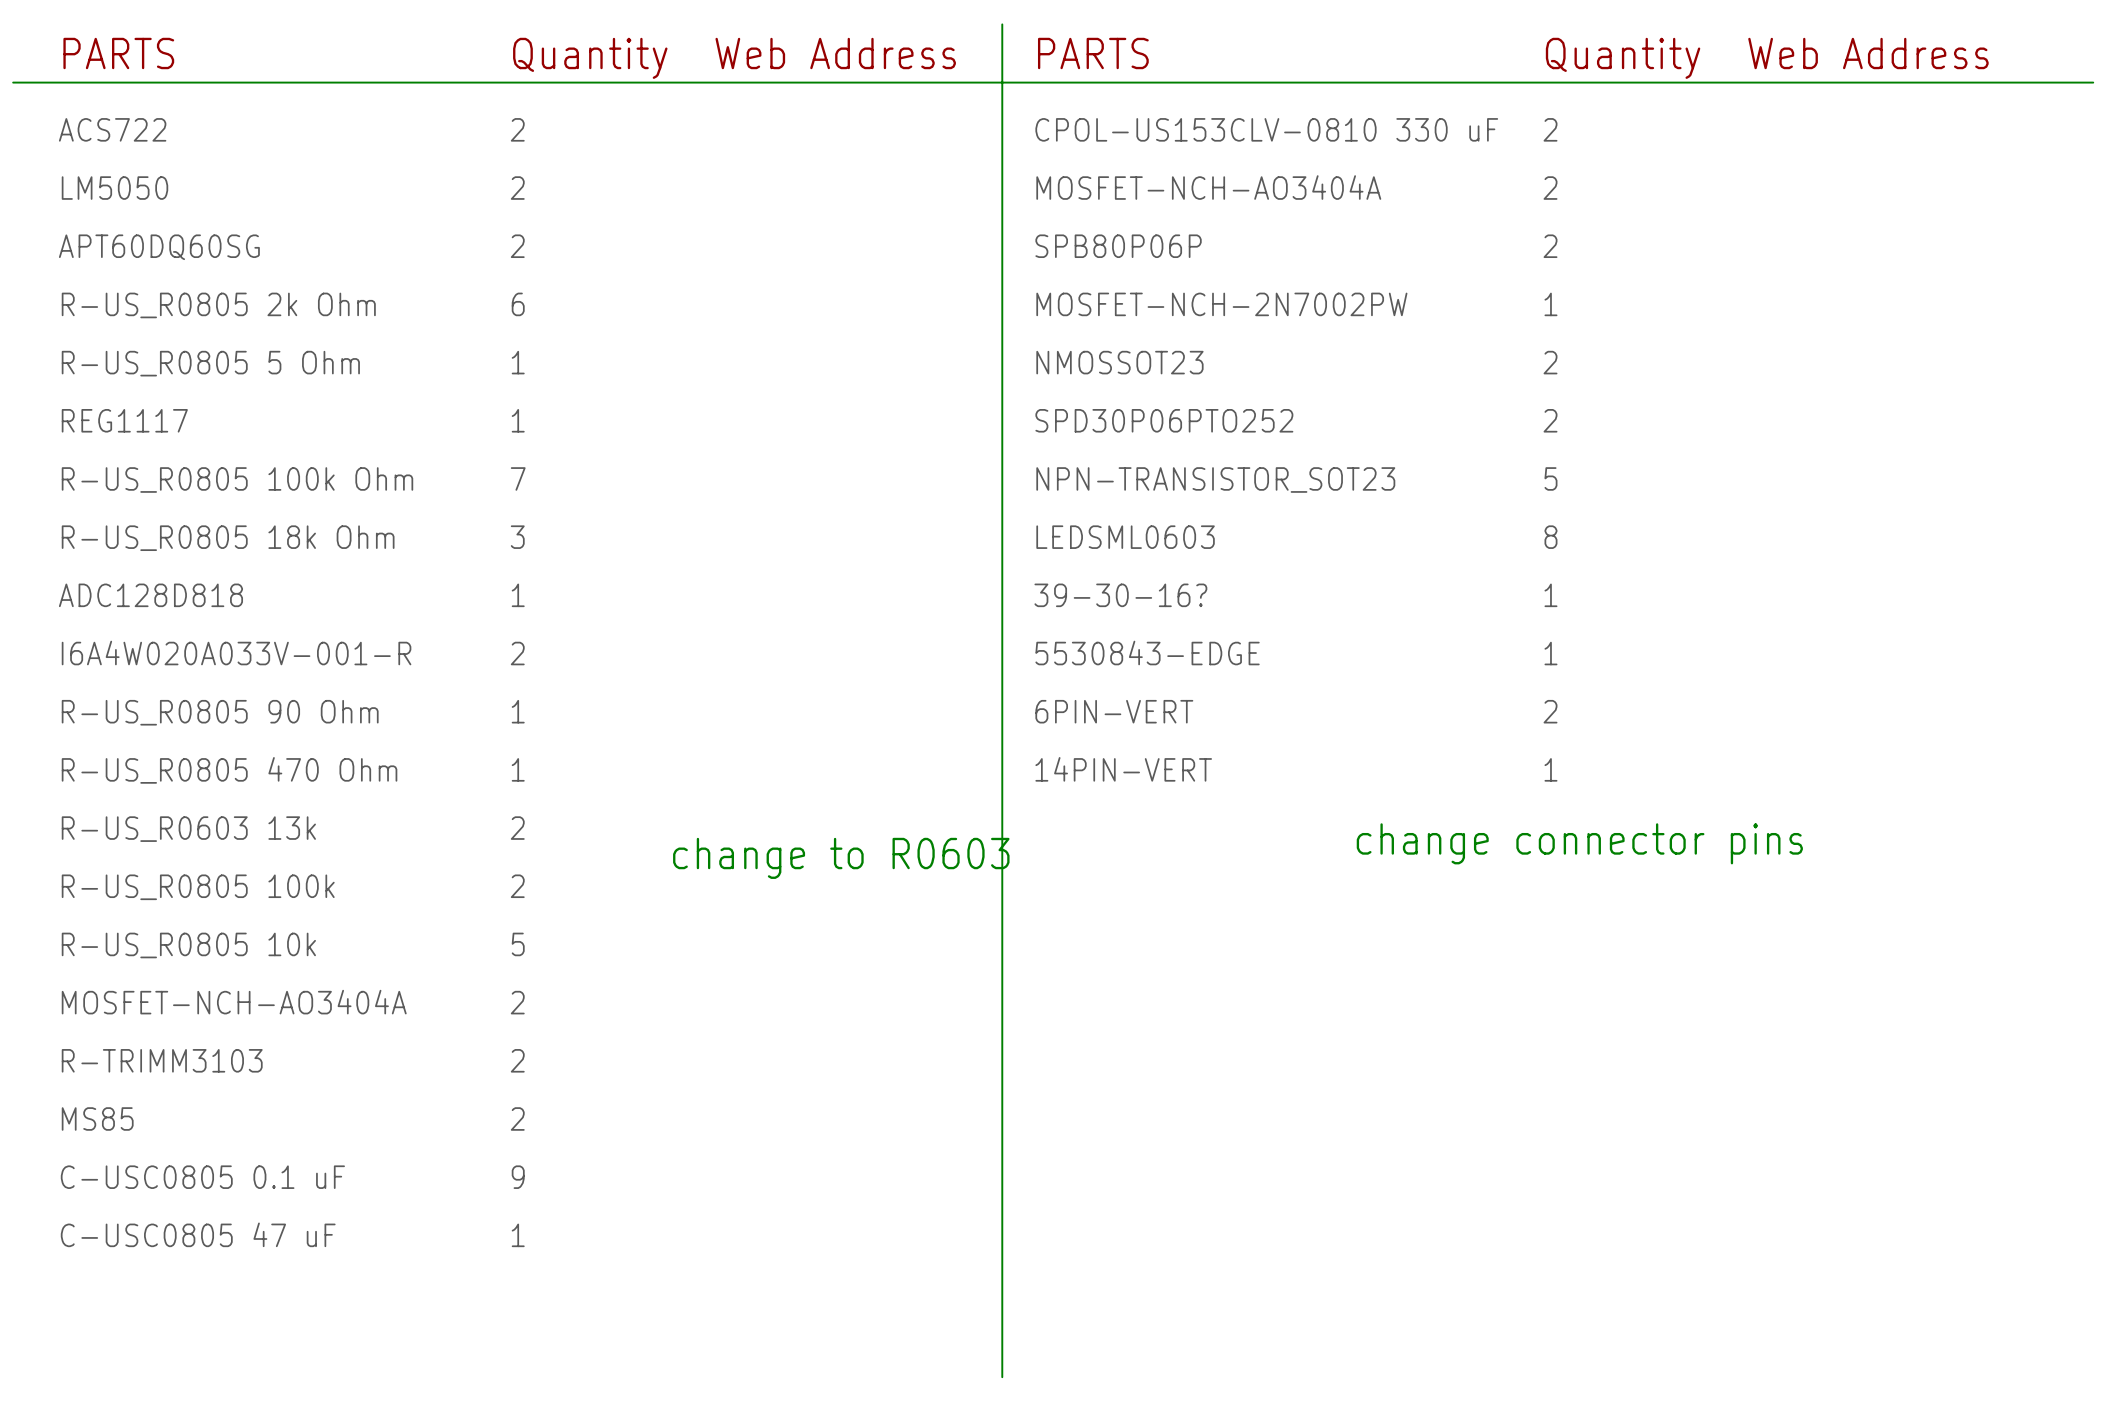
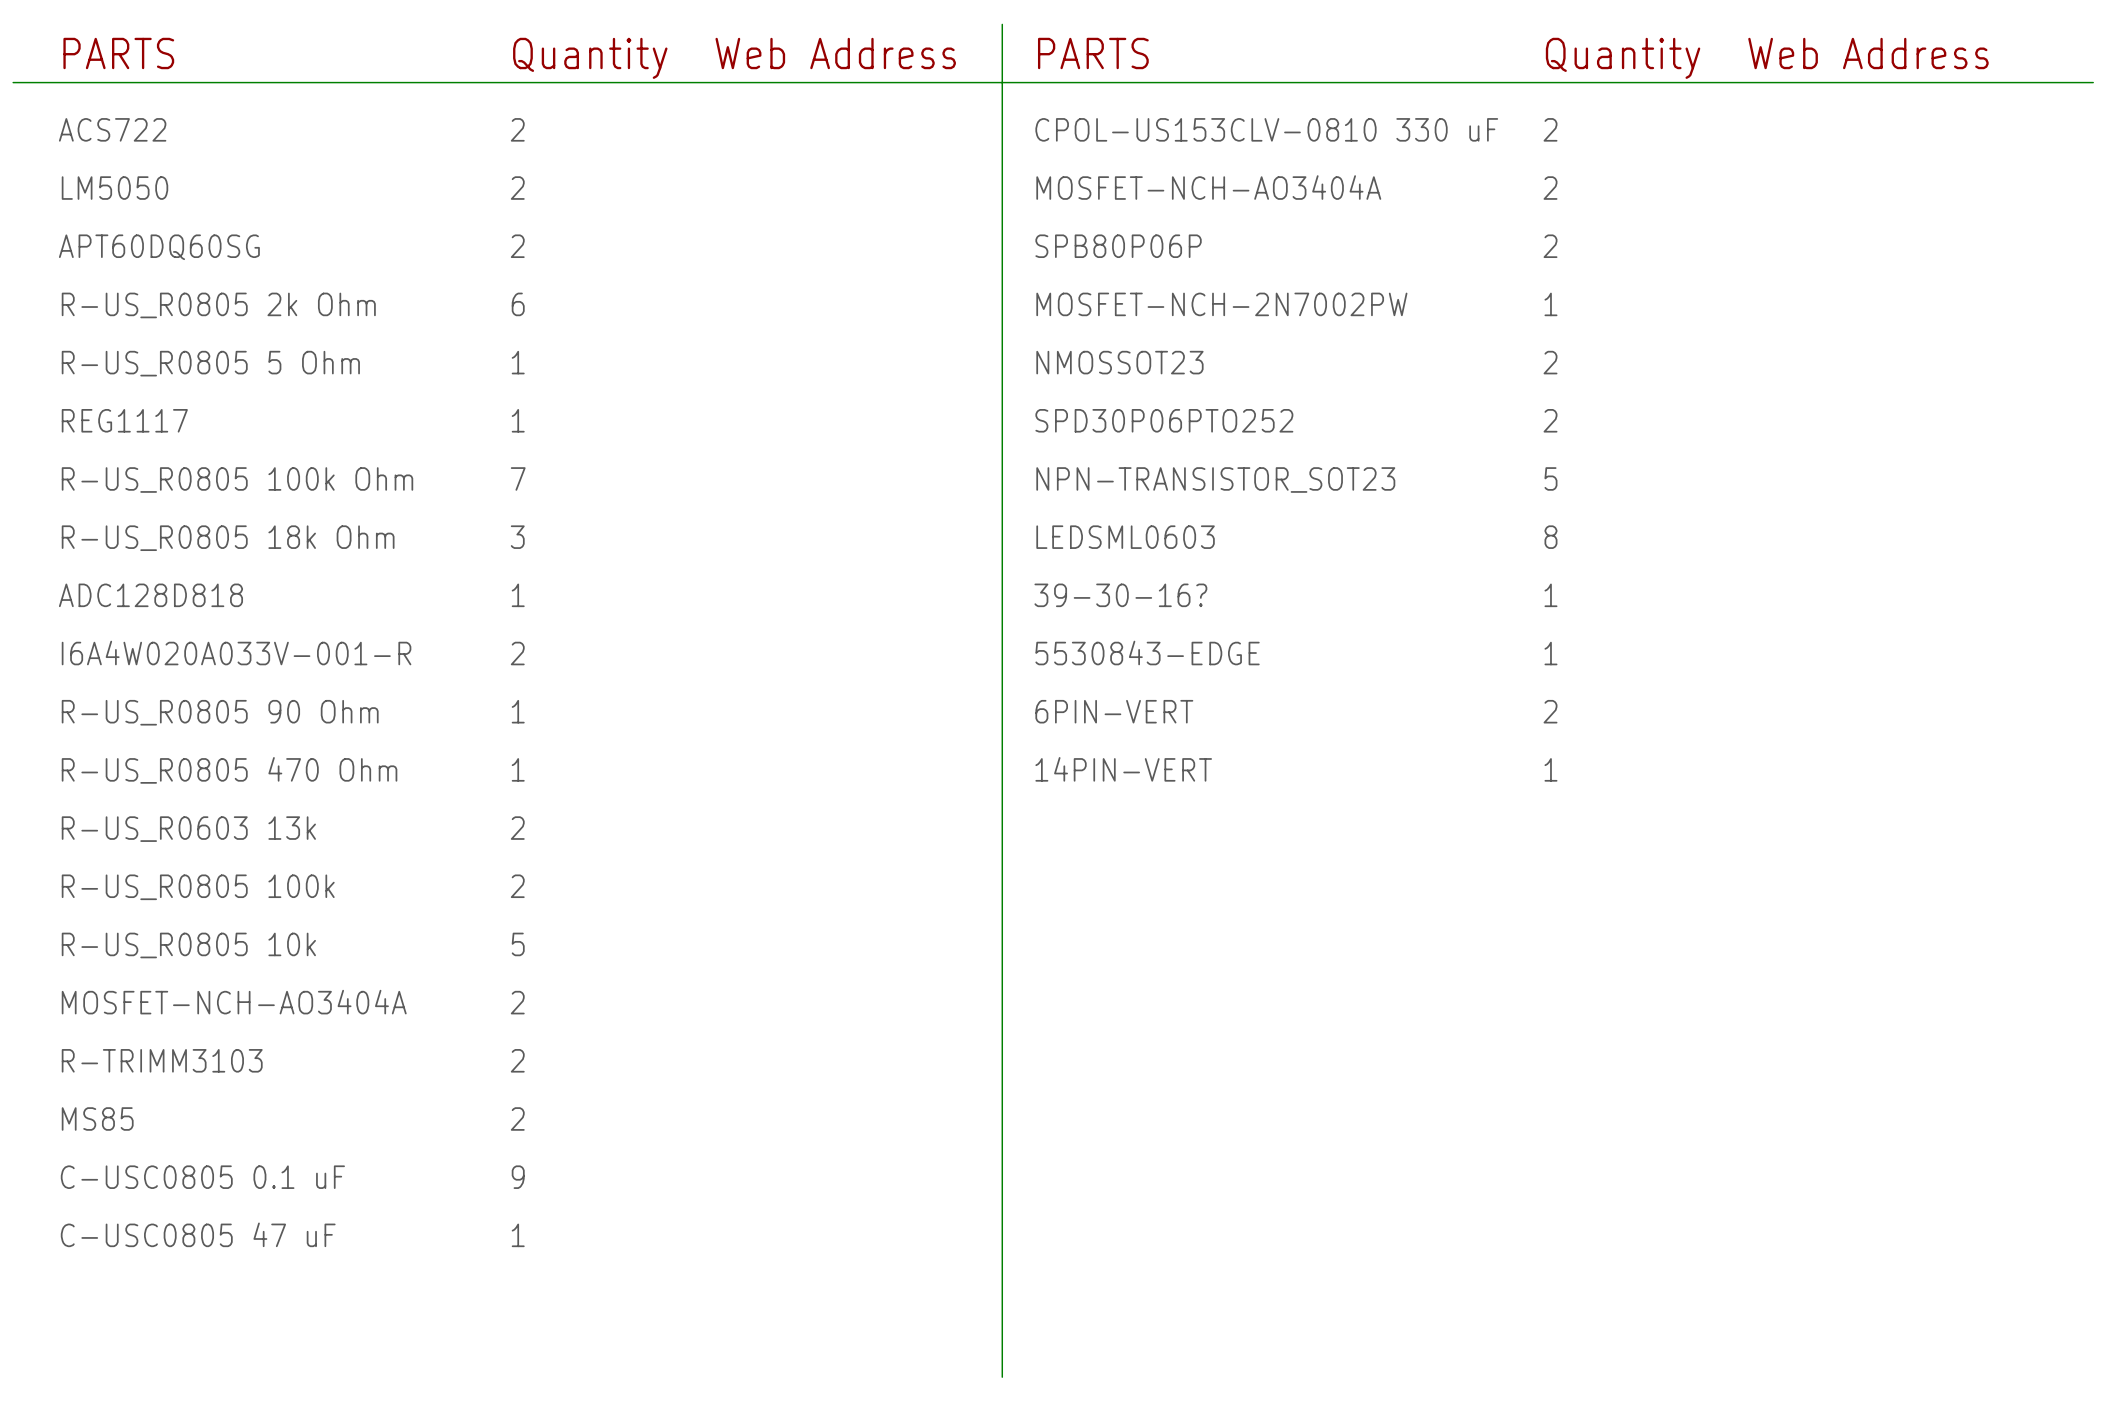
text: change connector pins (1579, 843) -> none
text: change to R0603 (841, 858) -> none

